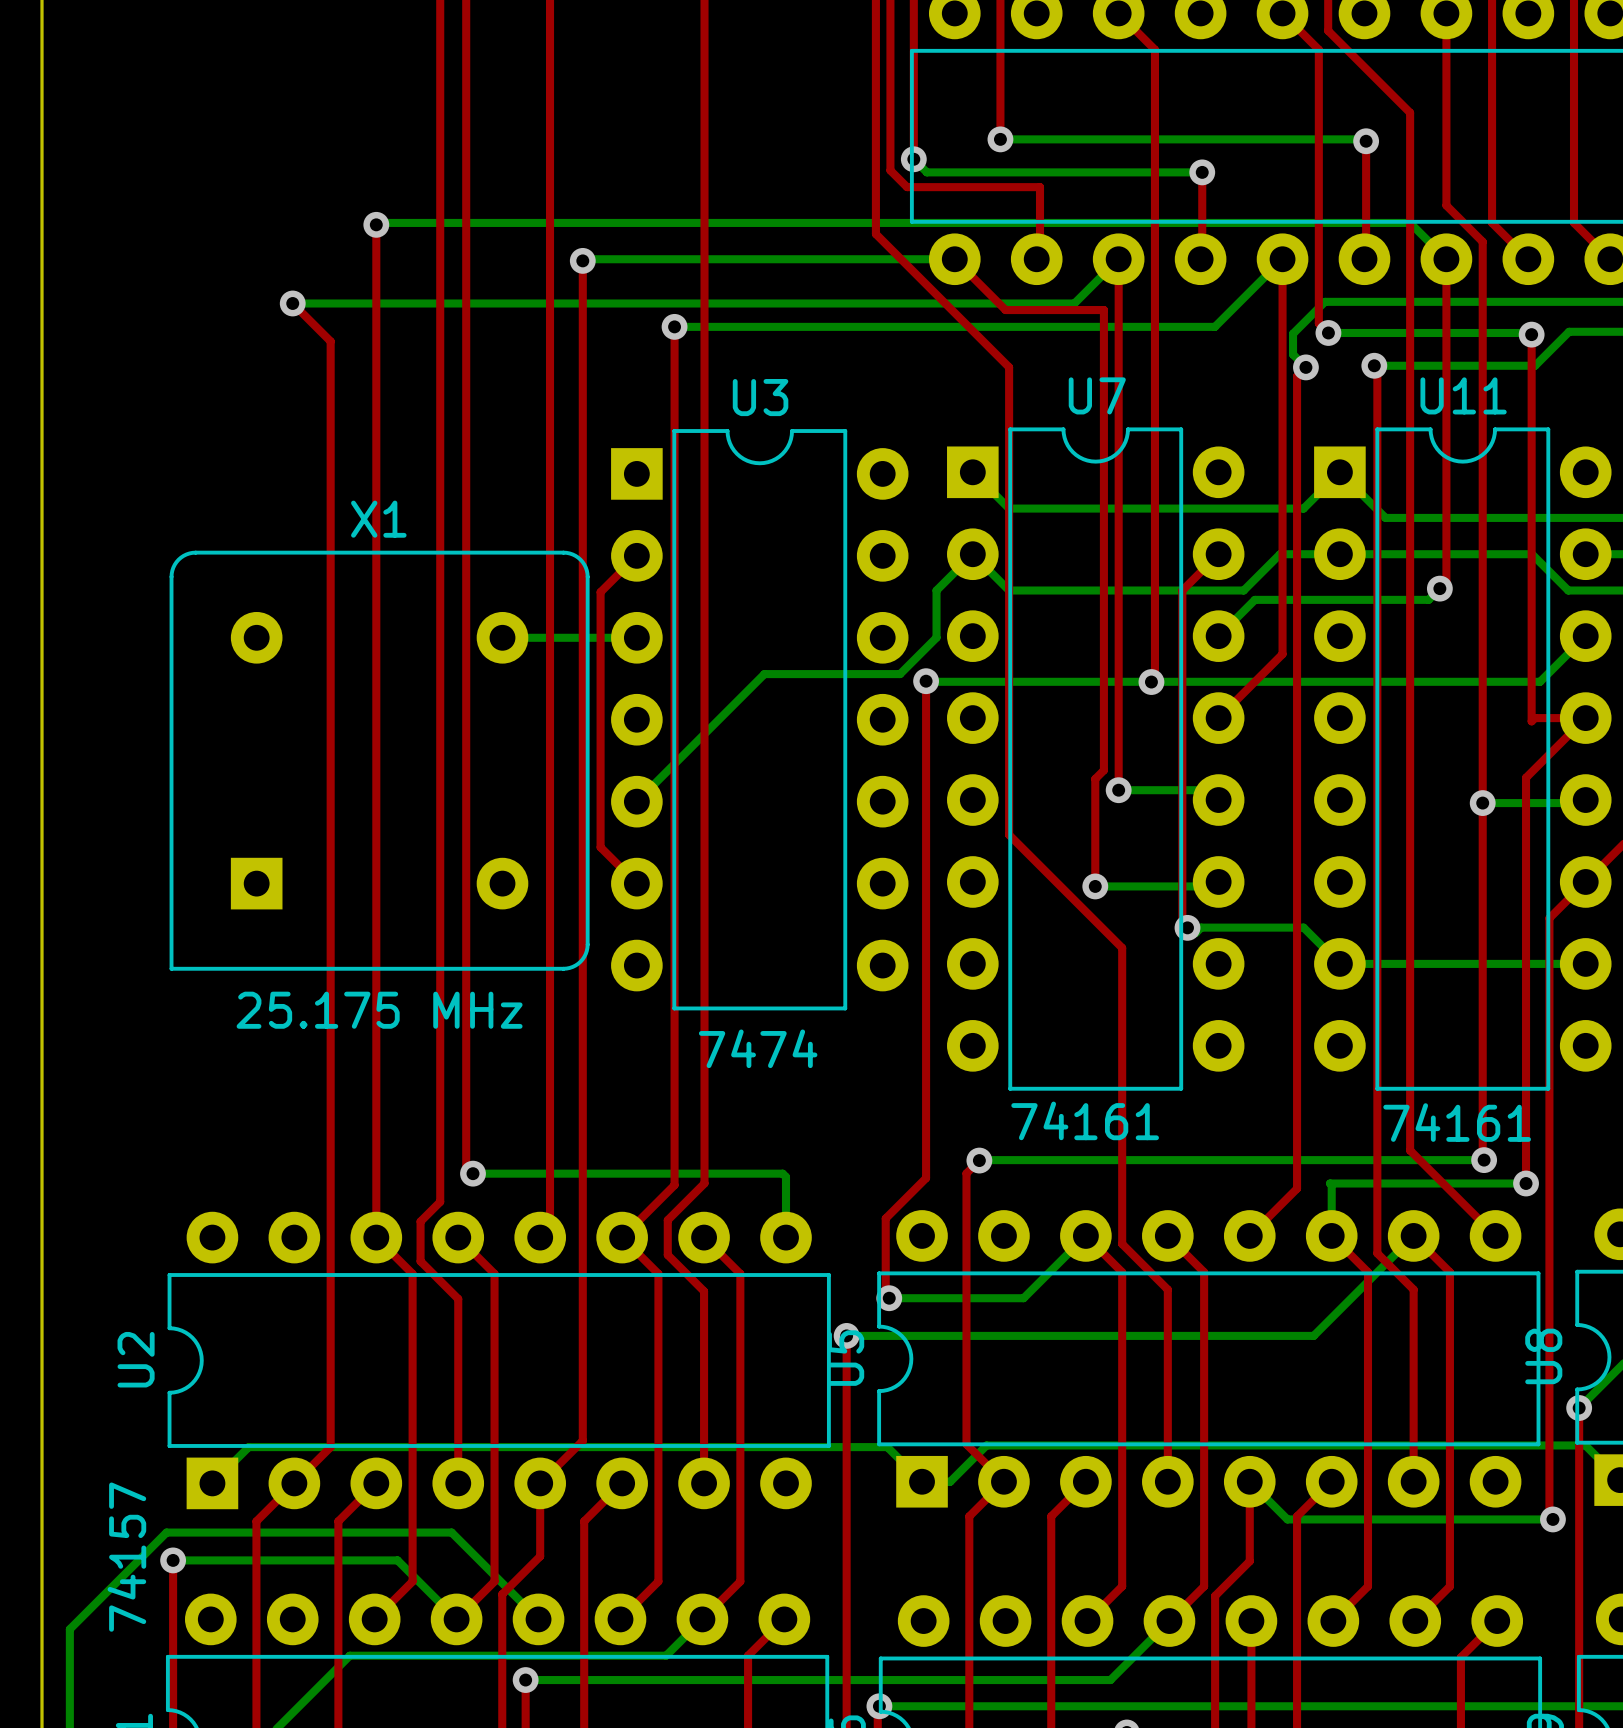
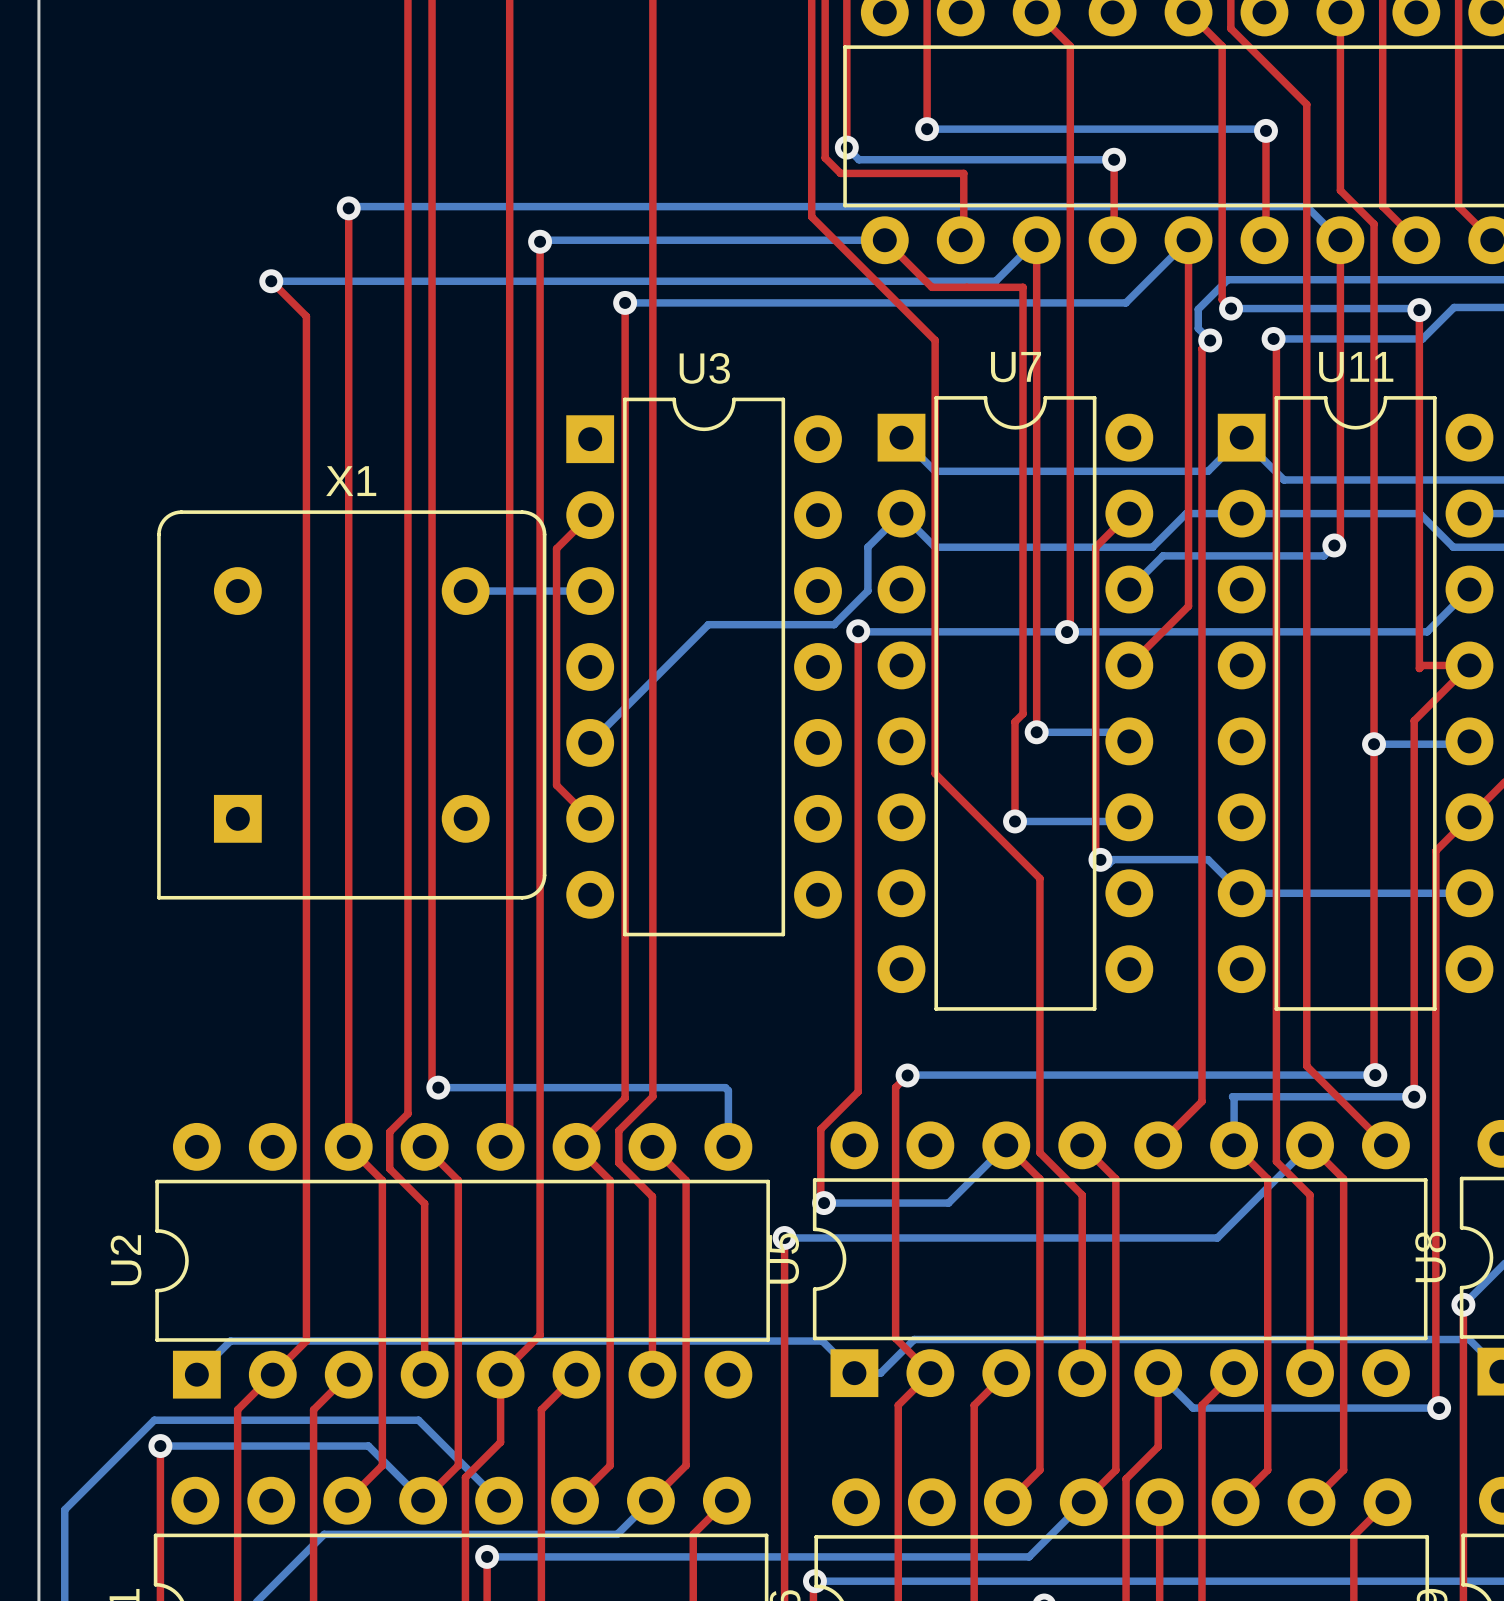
text: 25.175 MHz (379, 1010) -> none
text: 7474 (758, 1048) -> none
text: 74161 (1085, 1120) -> none
text: 74161 (1457, 1122) -> none
text: 74157 (126, 1557) -> none

